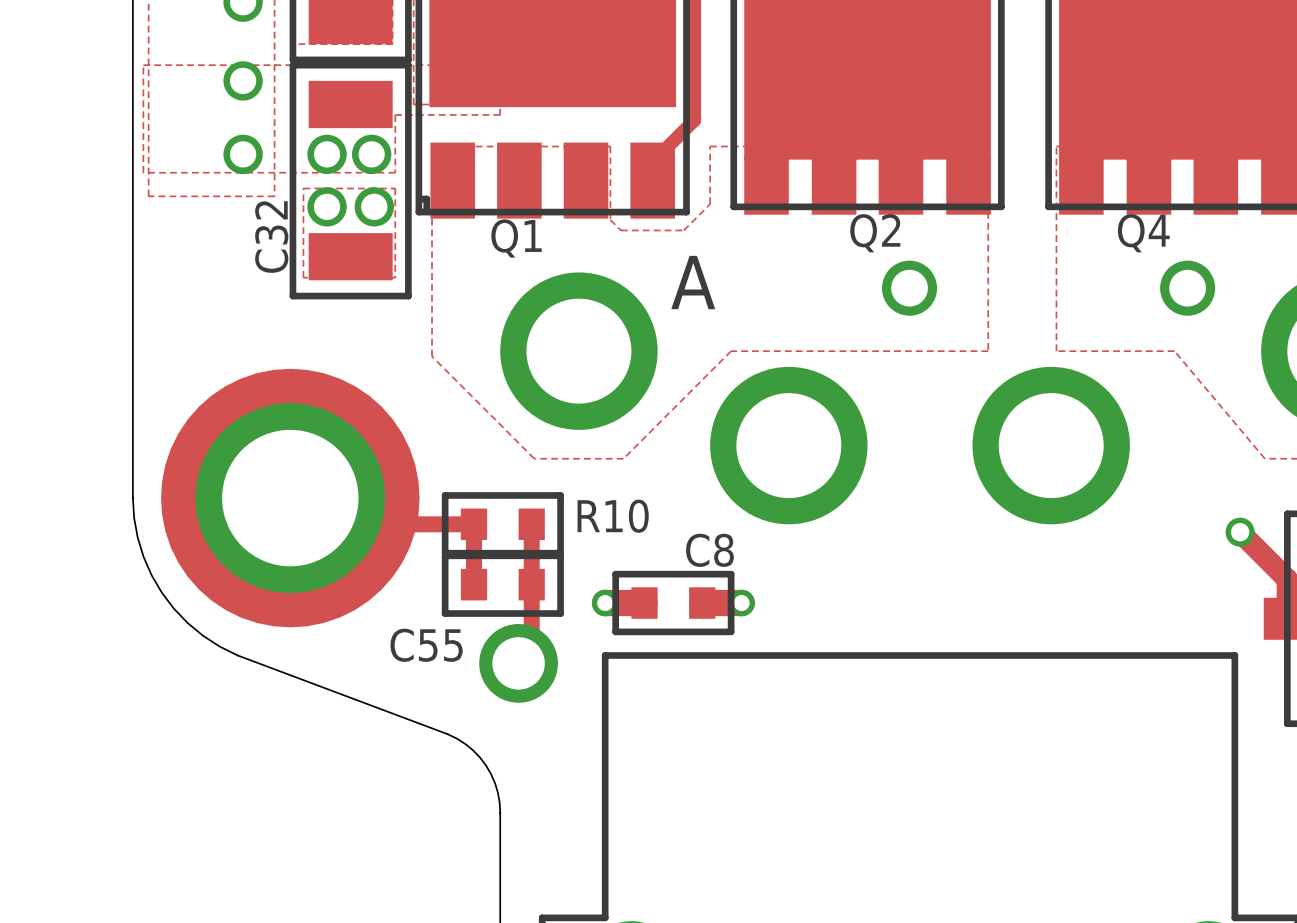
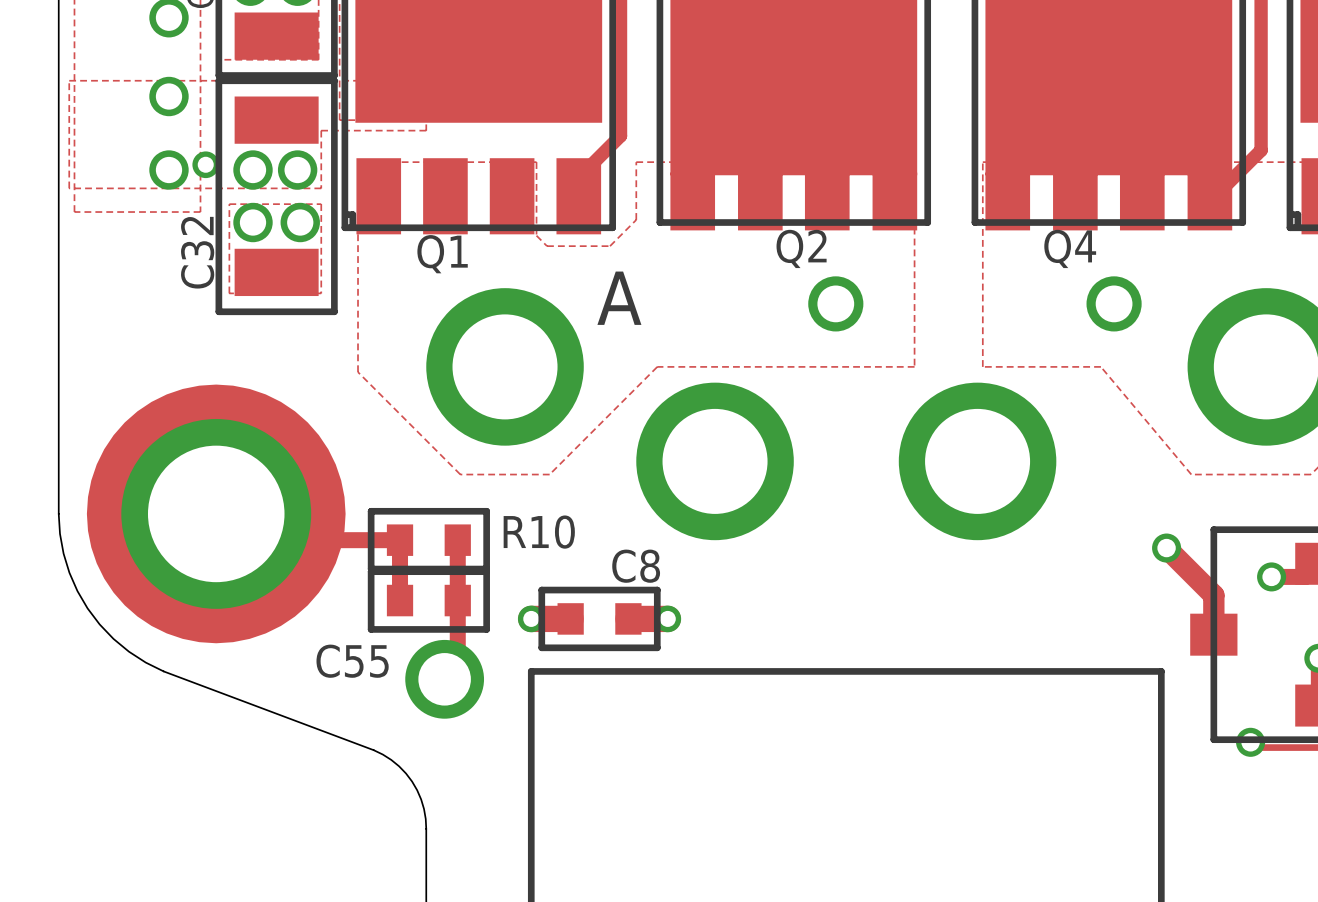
via: none -> (205, 164)

